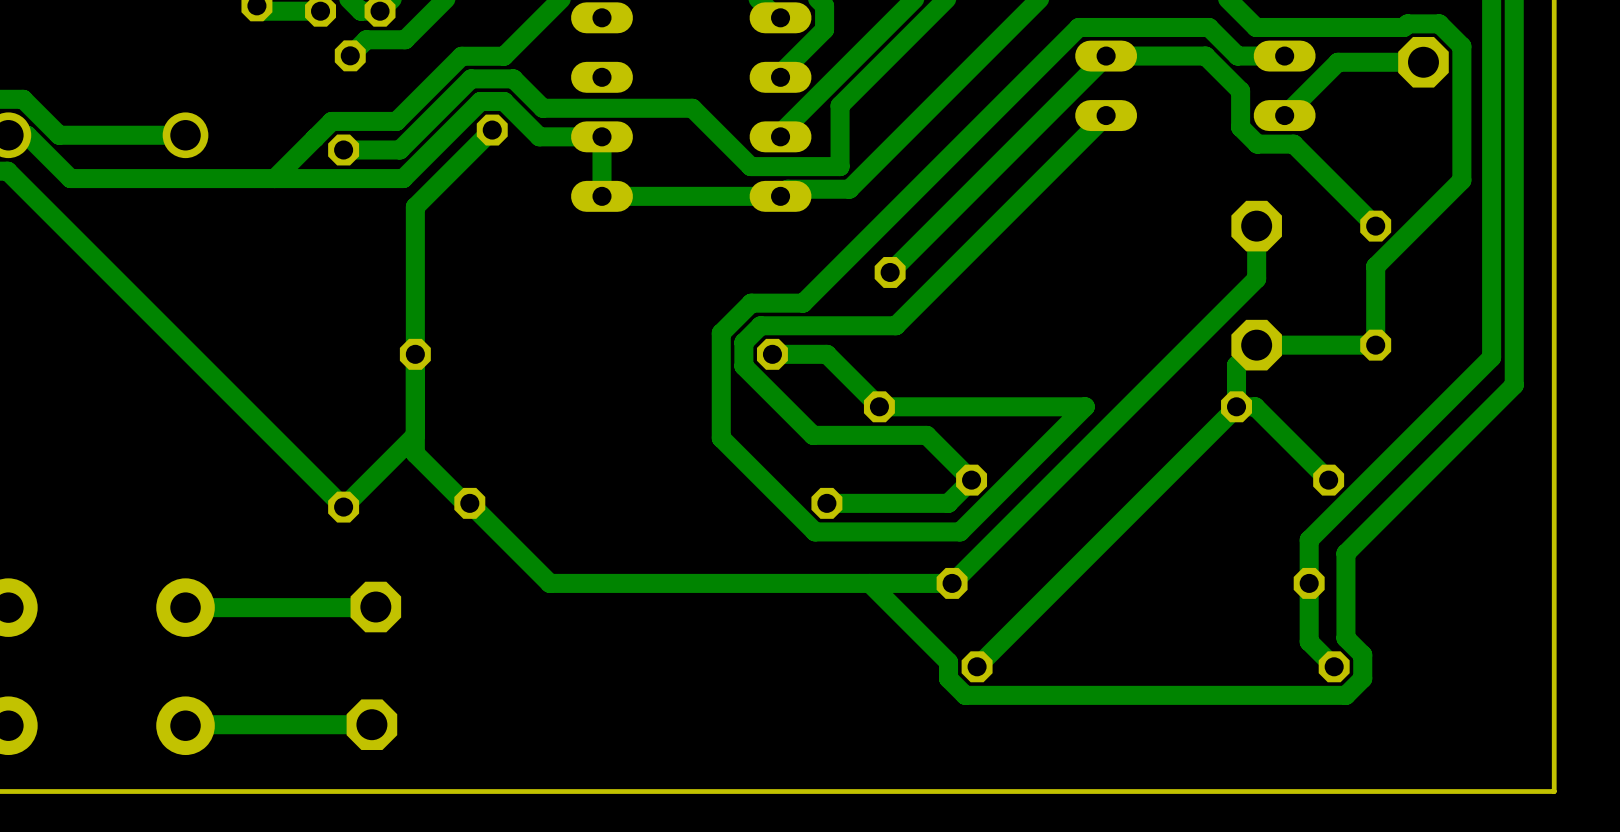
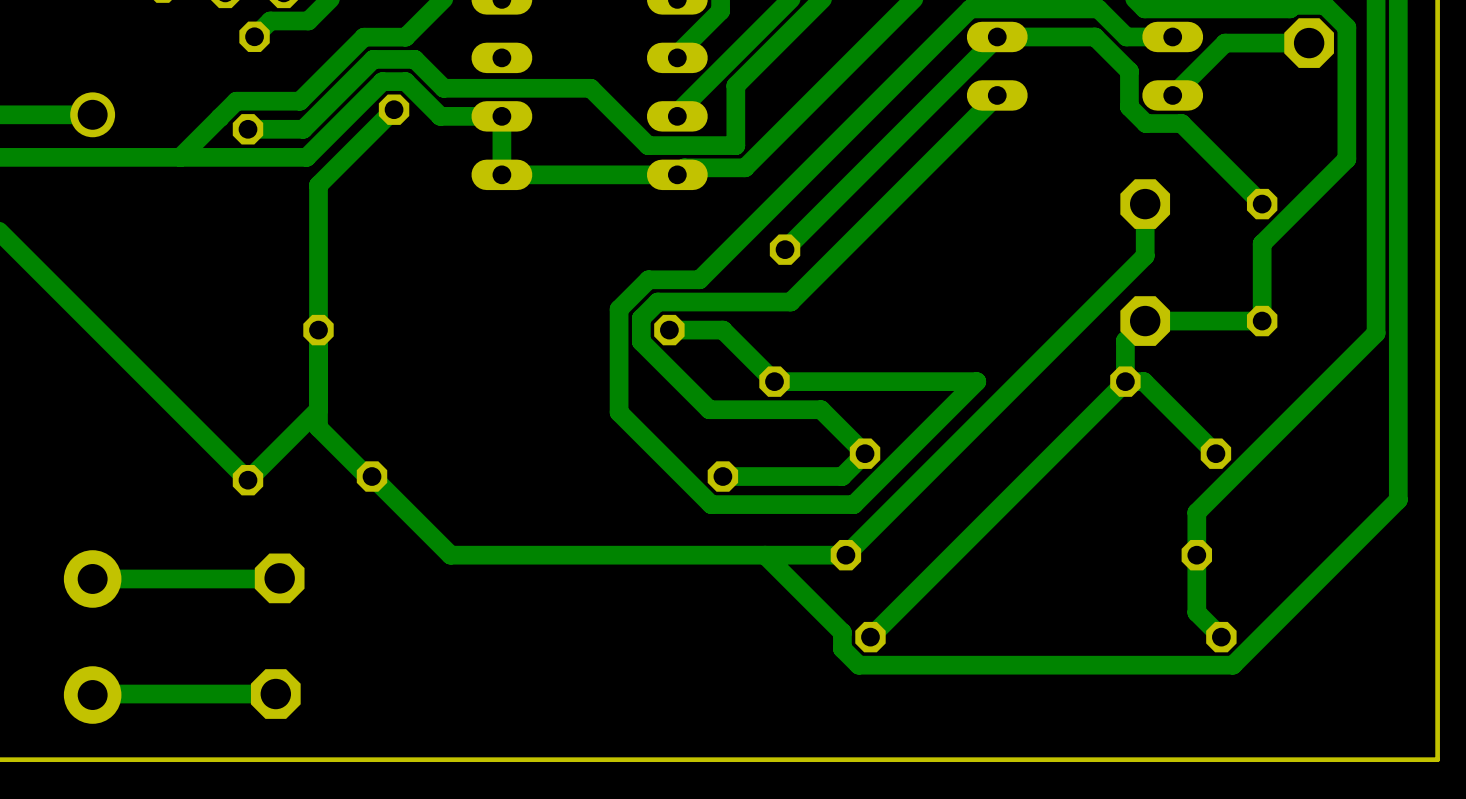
bottom track: (1514, 385) (1345, 553) (1345, 638) (1362, 654) (1362, 678) -> (1398, 360) (1398, 499) (1249, 648)

